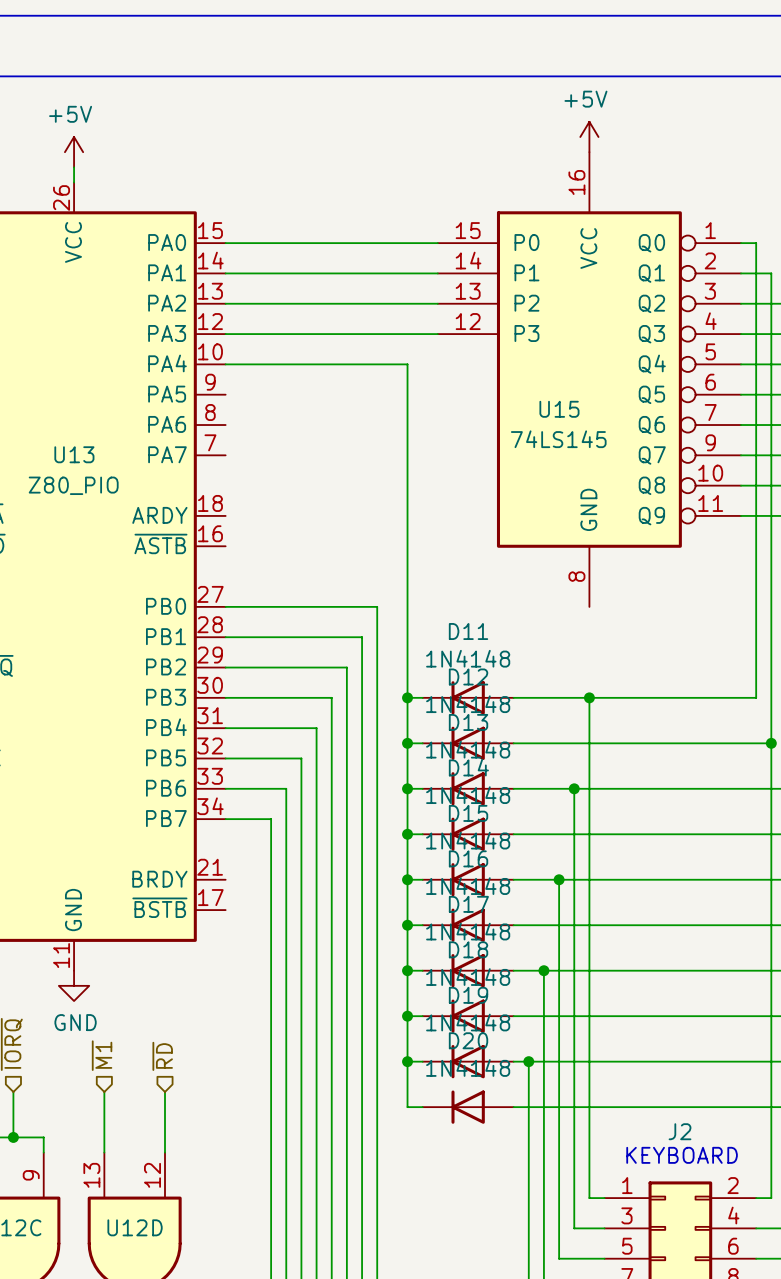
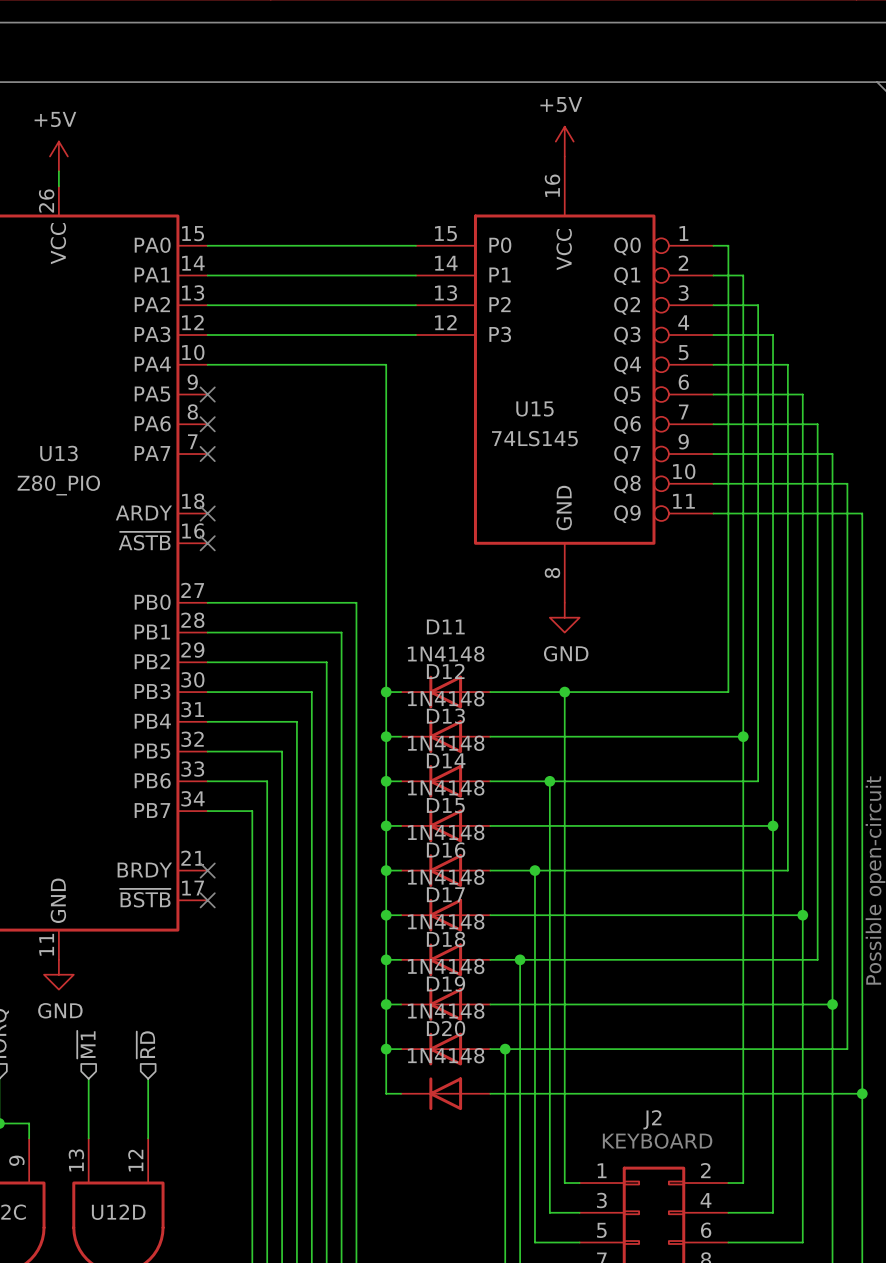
no-connect mark: none -> (207, 394)
no-connect mark: none -> (207, 424)
no-connect mark: none -> (207, 454)
no-connect mark: none -> (207, 513)
no-connect mark: none -> (207, 543)
power symbol: none -> GND (564, 617)
no-connect mark: none -> (207, 870)
no-connect mark: none -> (207, 900)

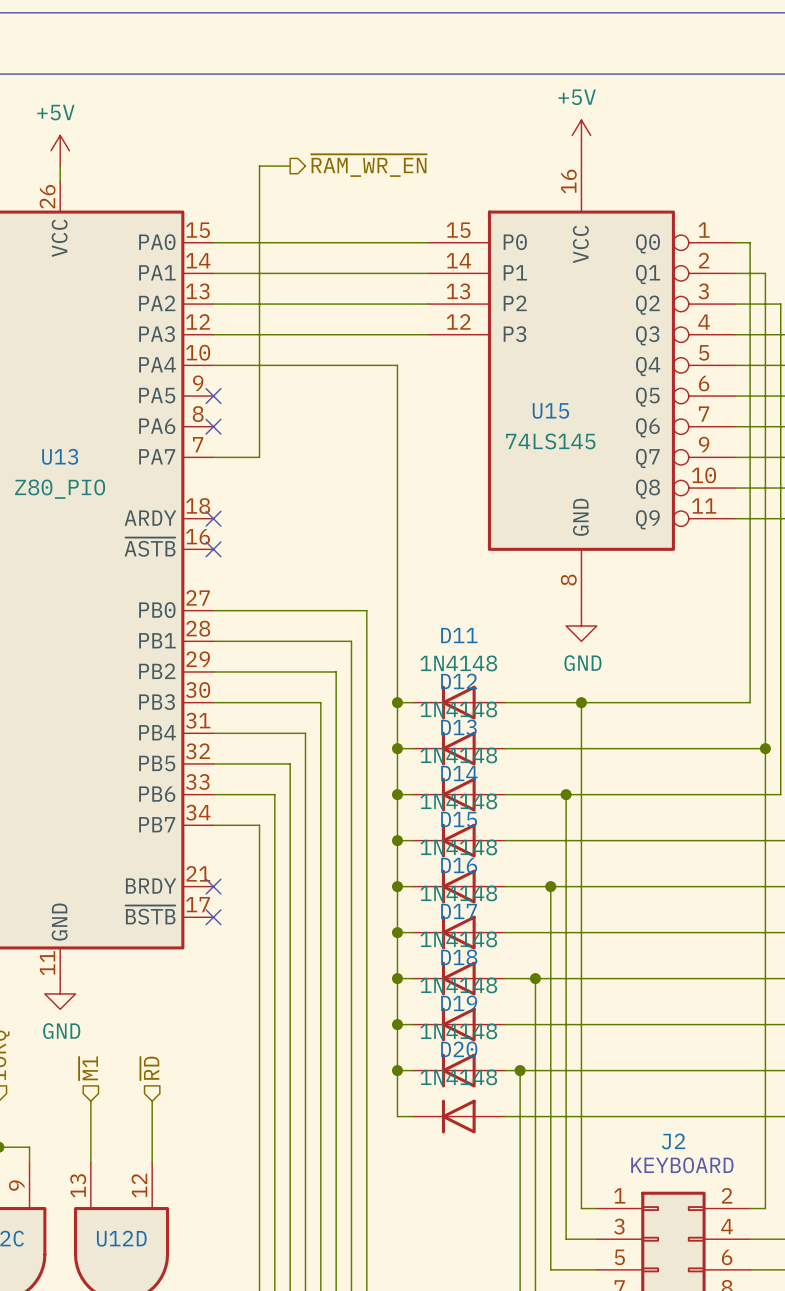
wire: none -> (290, 166) (259, 166) (259, 457) (213, 457)
hierarchical label: none -> ~{RAM_WR_EN} (368, 165)
no-connect mark: (207, 454) -> none

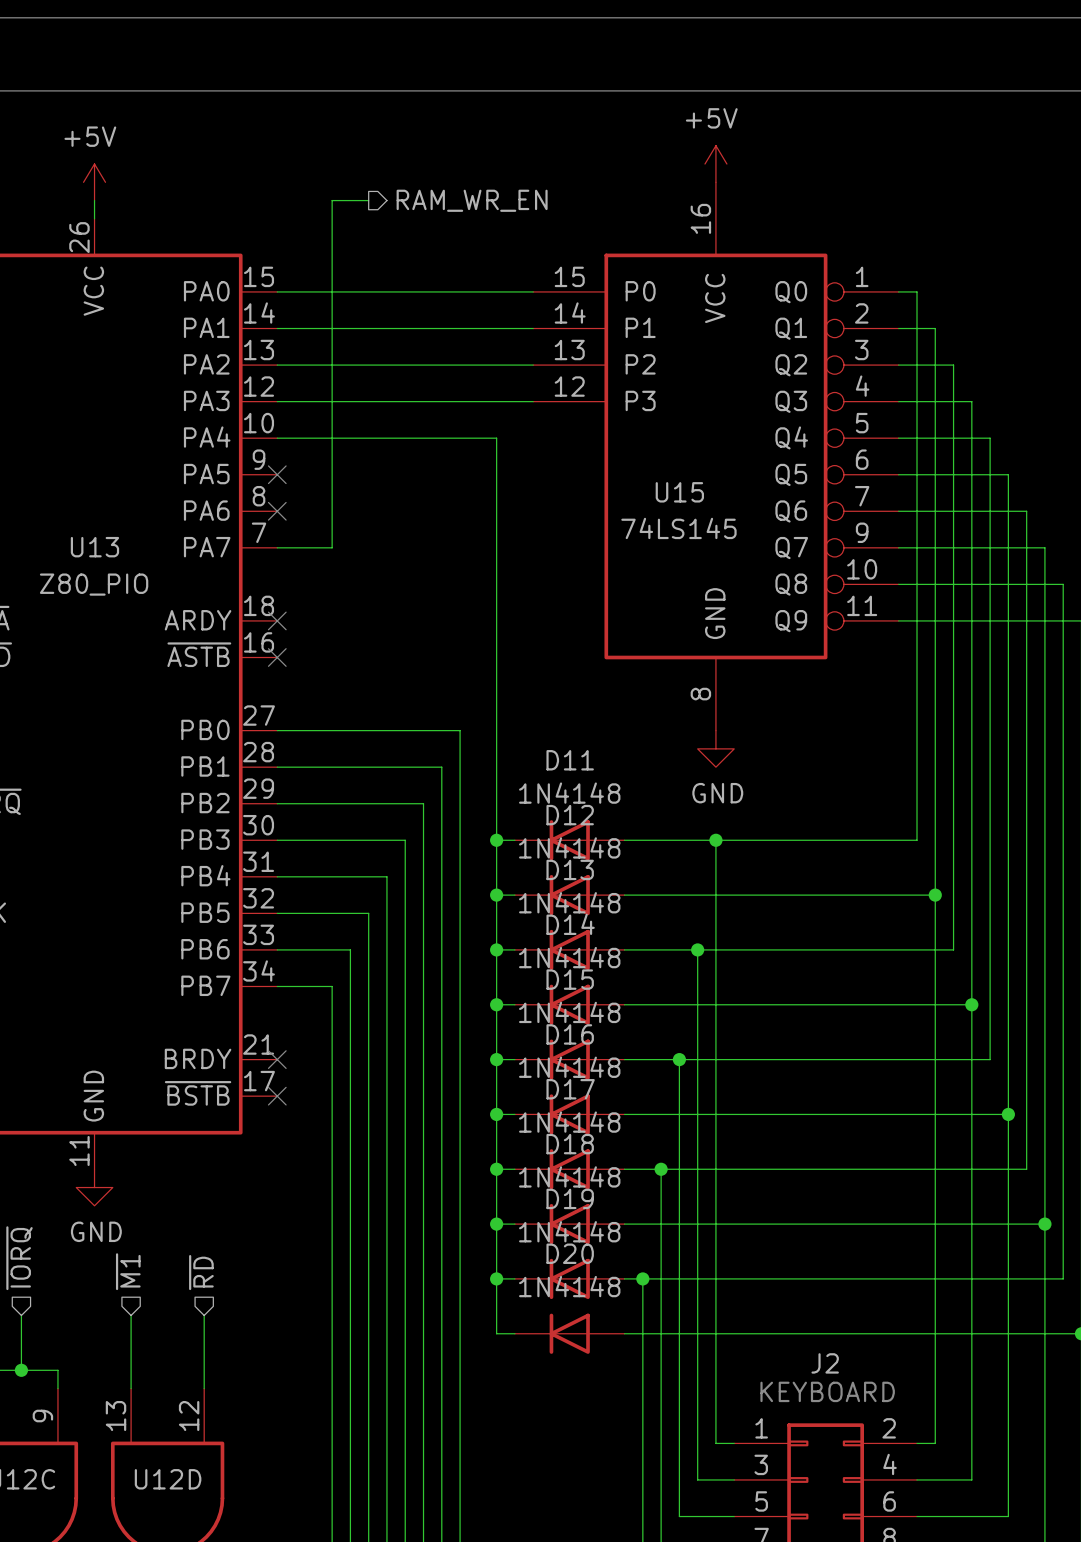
hierarchical label: ~{RAM_WR_EN} (368, 165) -> RAM_WR_EN (472, 200)

